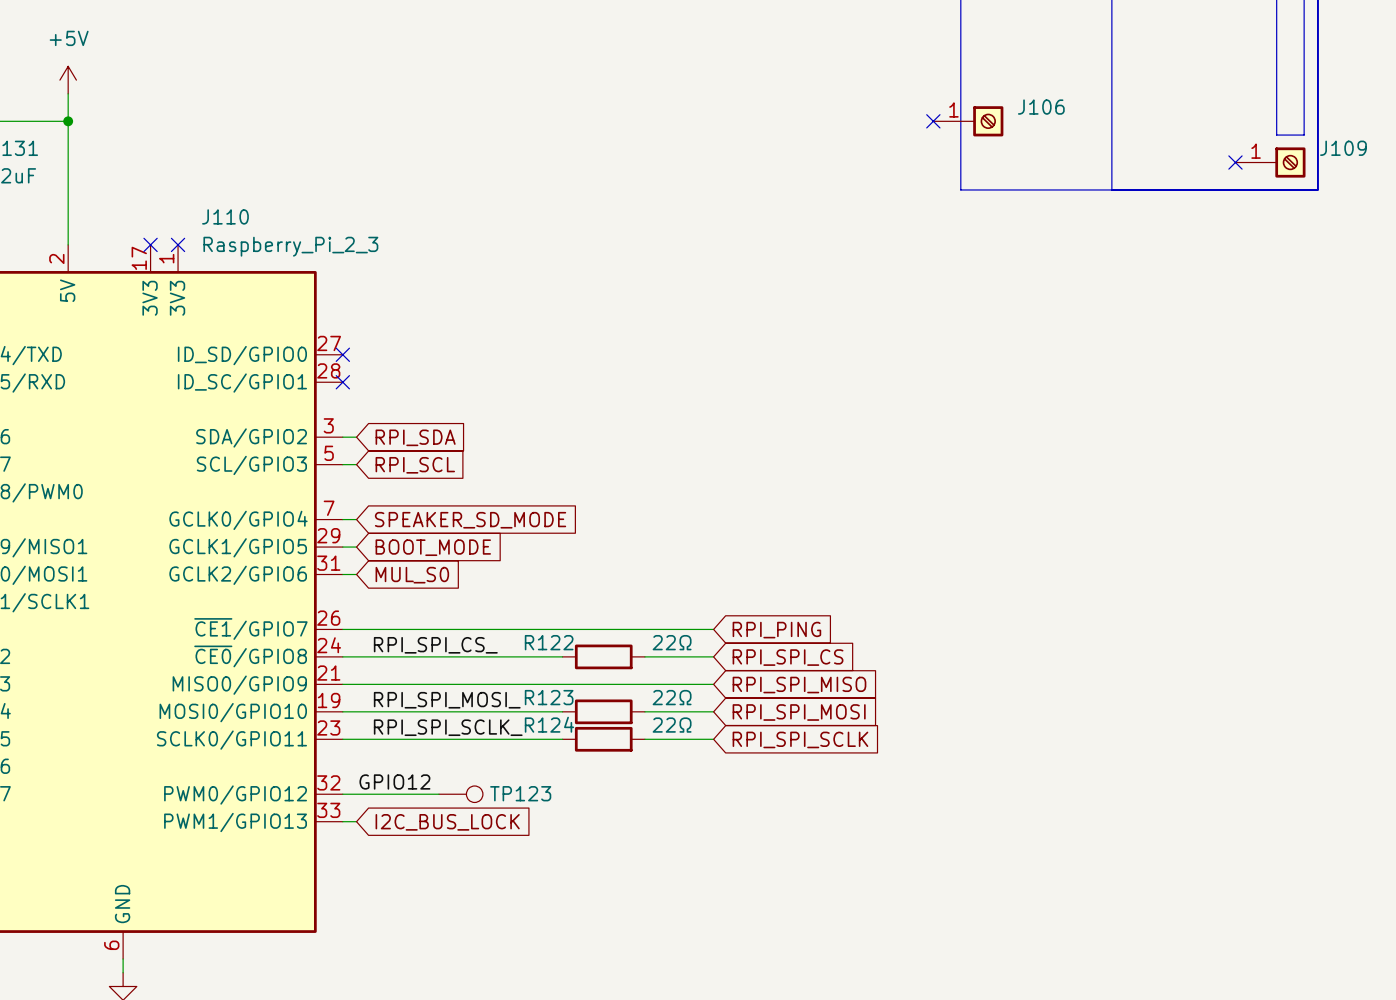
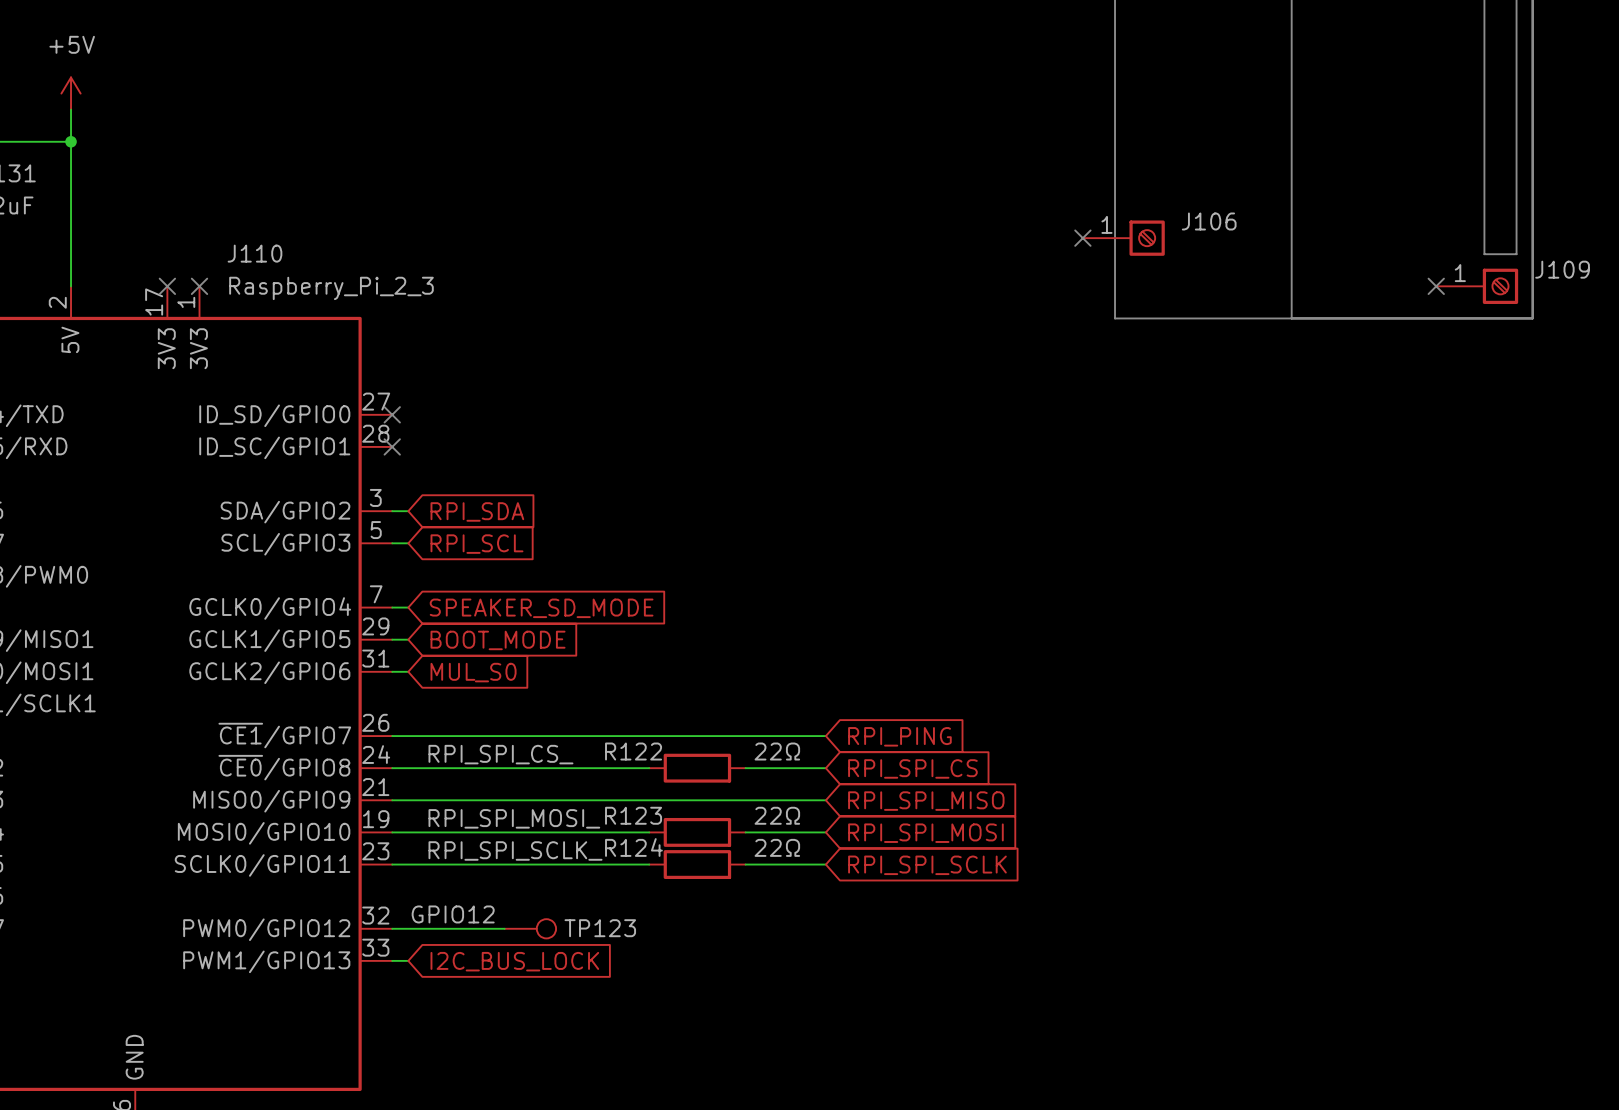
no-connect mark: (933, 121) -> none
J106 position: (968, 121) -> (1123, 238)
line: (1276, 135) (1304, 135) -> (1484, 157) (1484, 254) (1516, 254) (1516, 157)
no-connect mark: (1235, 162) -> none
J109 position: (1270, 162) -> (1477, 286)
line: (960, 189) (1317, 189) -> (1115, 222) (1115, 318) (1532, 318) (1532, 222)
line: none -> (1291, 222) (1291, 318)
no-connect mark: none -> (1082, 238)
no-connect mark: none -> (1436, 286)

